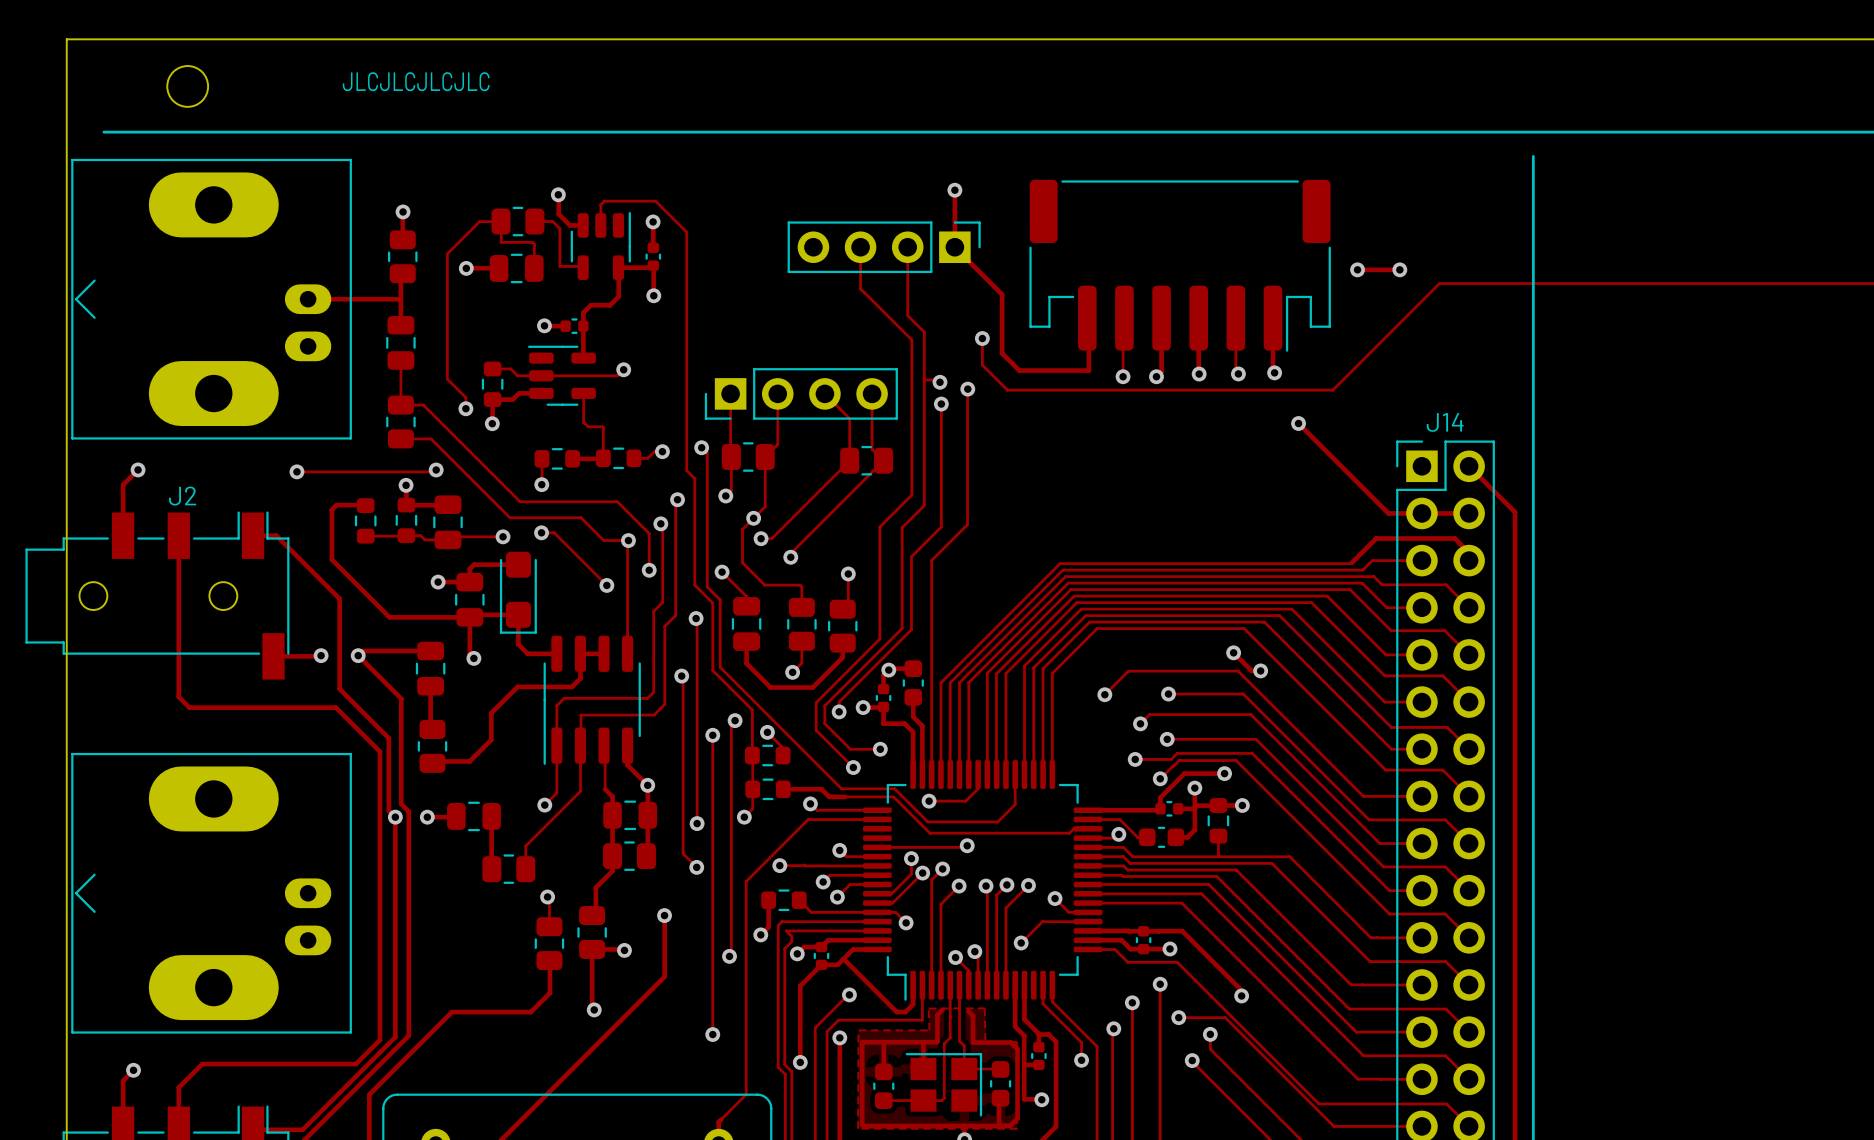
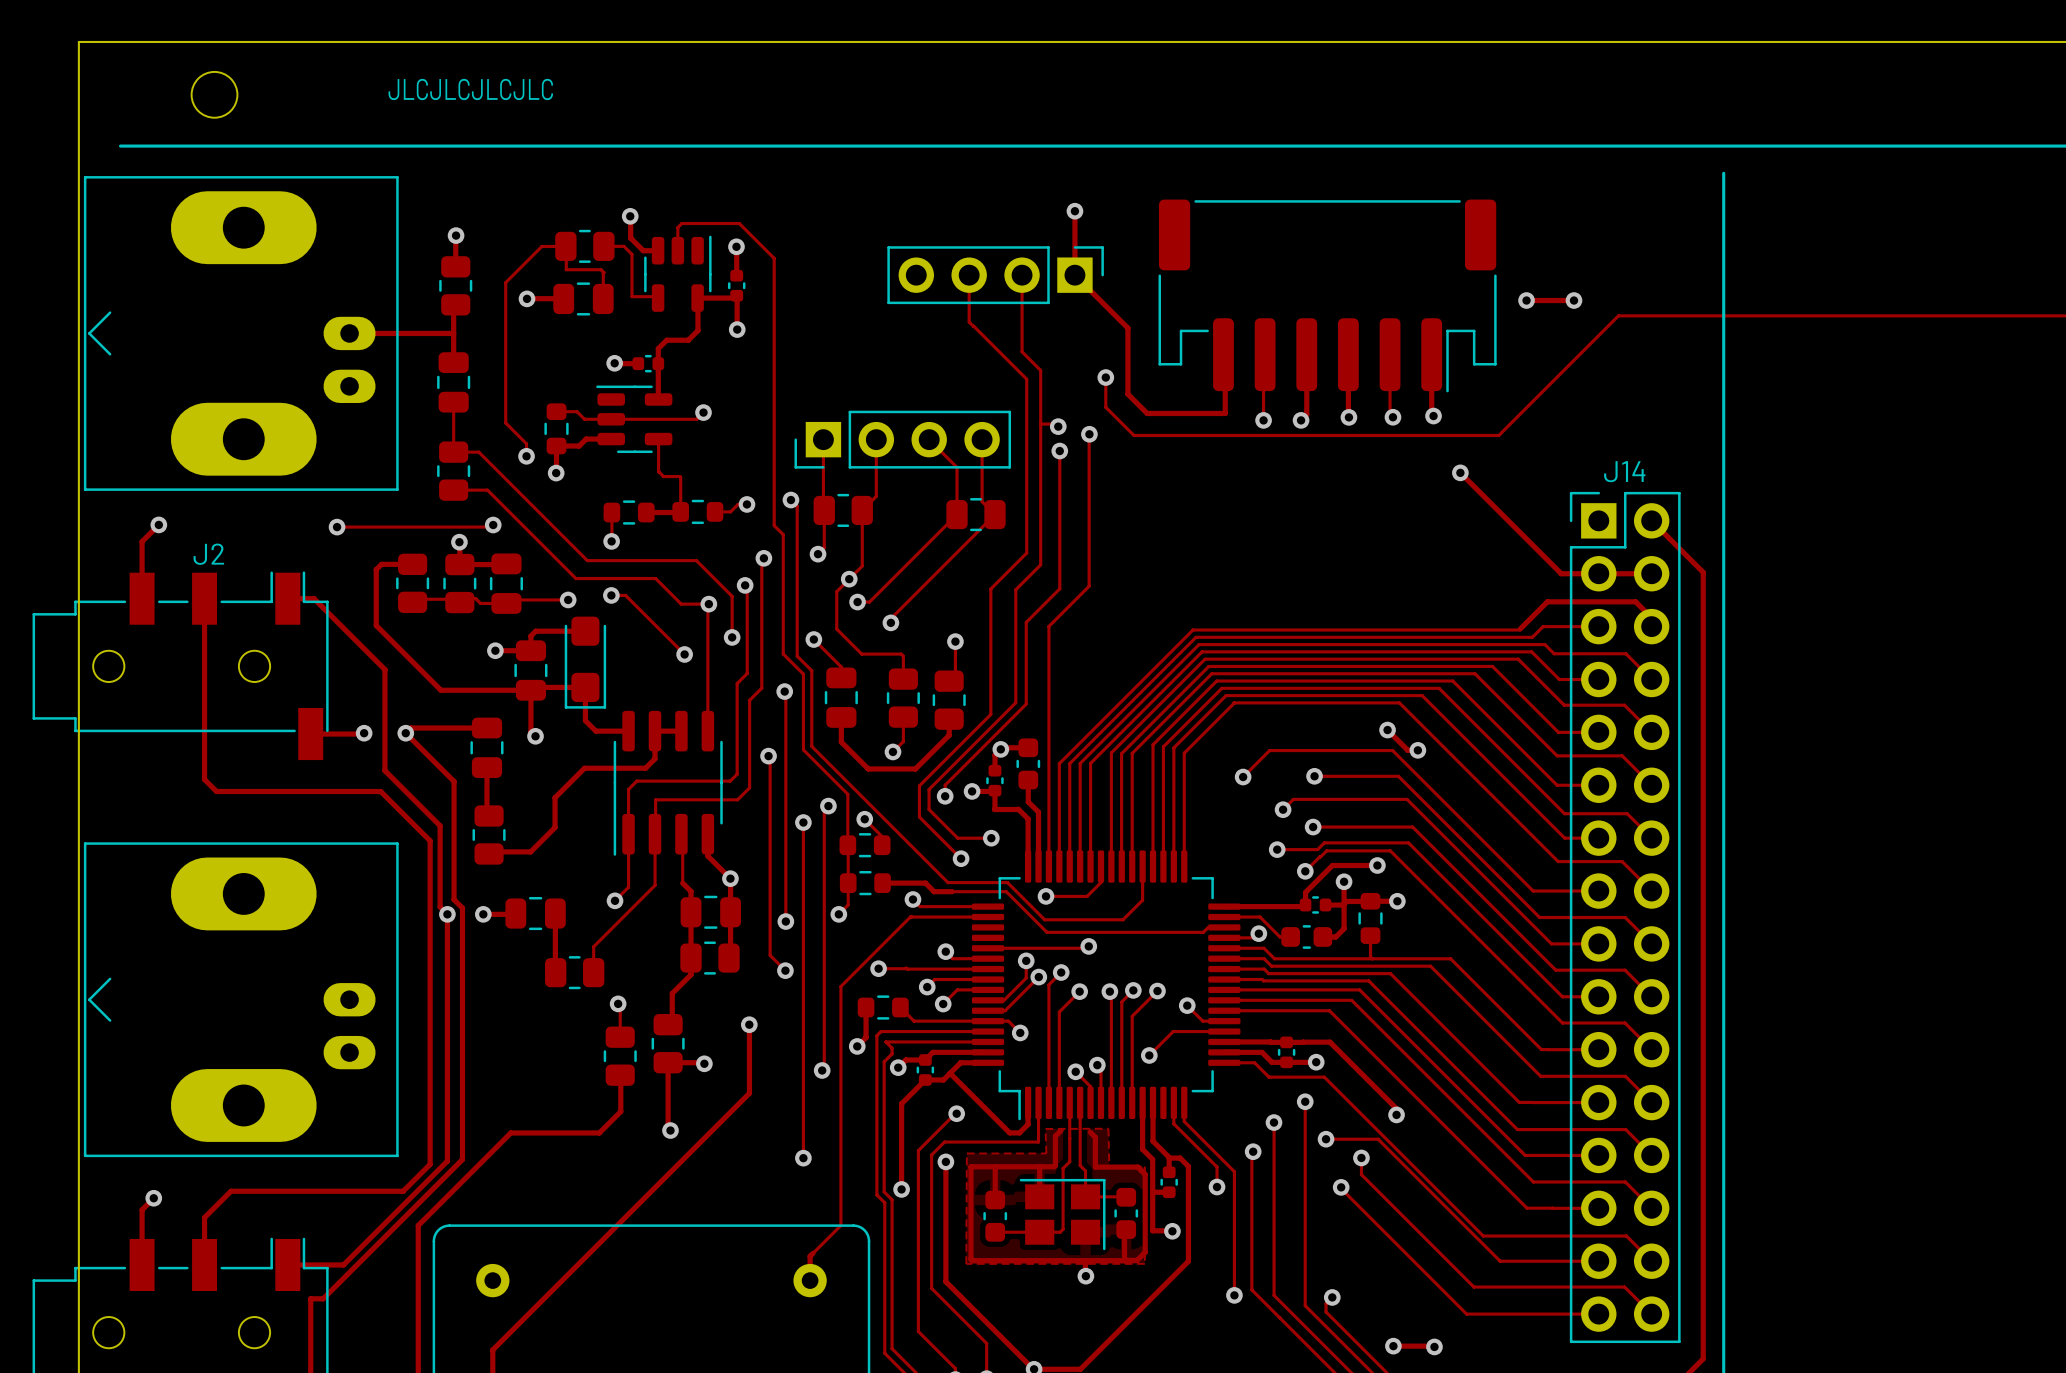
part footprint: [395, 497, 418, 544] -> [443, 553, 477, 614]
part footprint: [354, 498, 377, 544] -> [396, 553, 430, 614]

